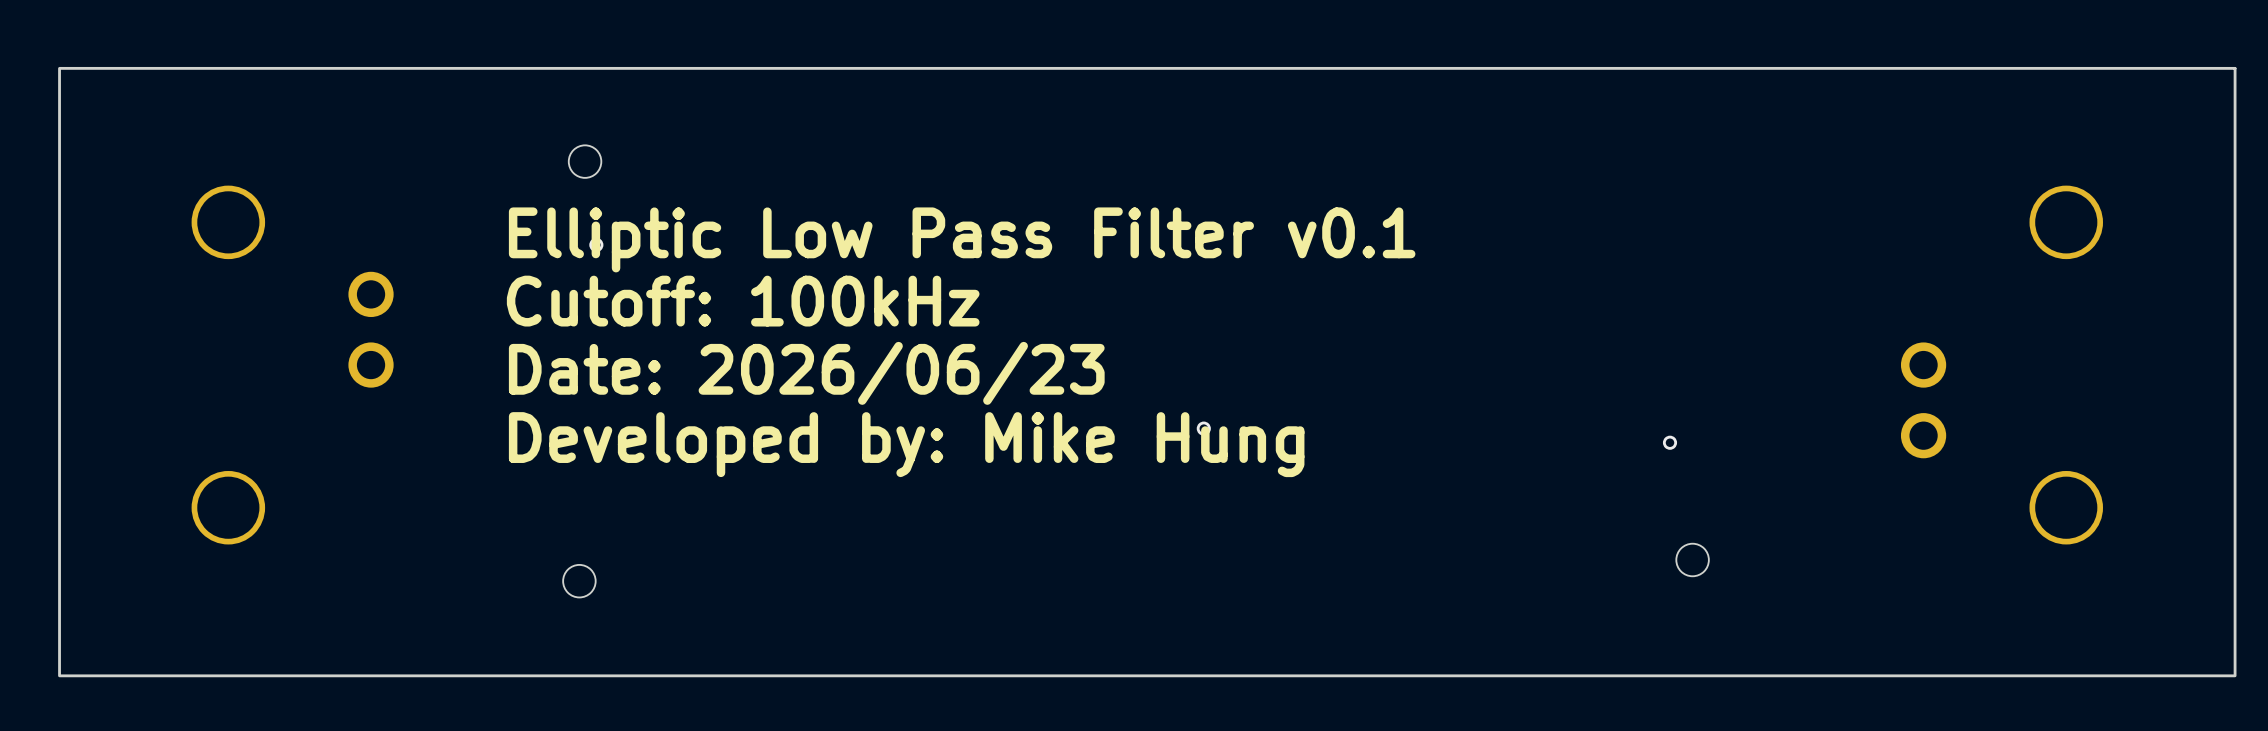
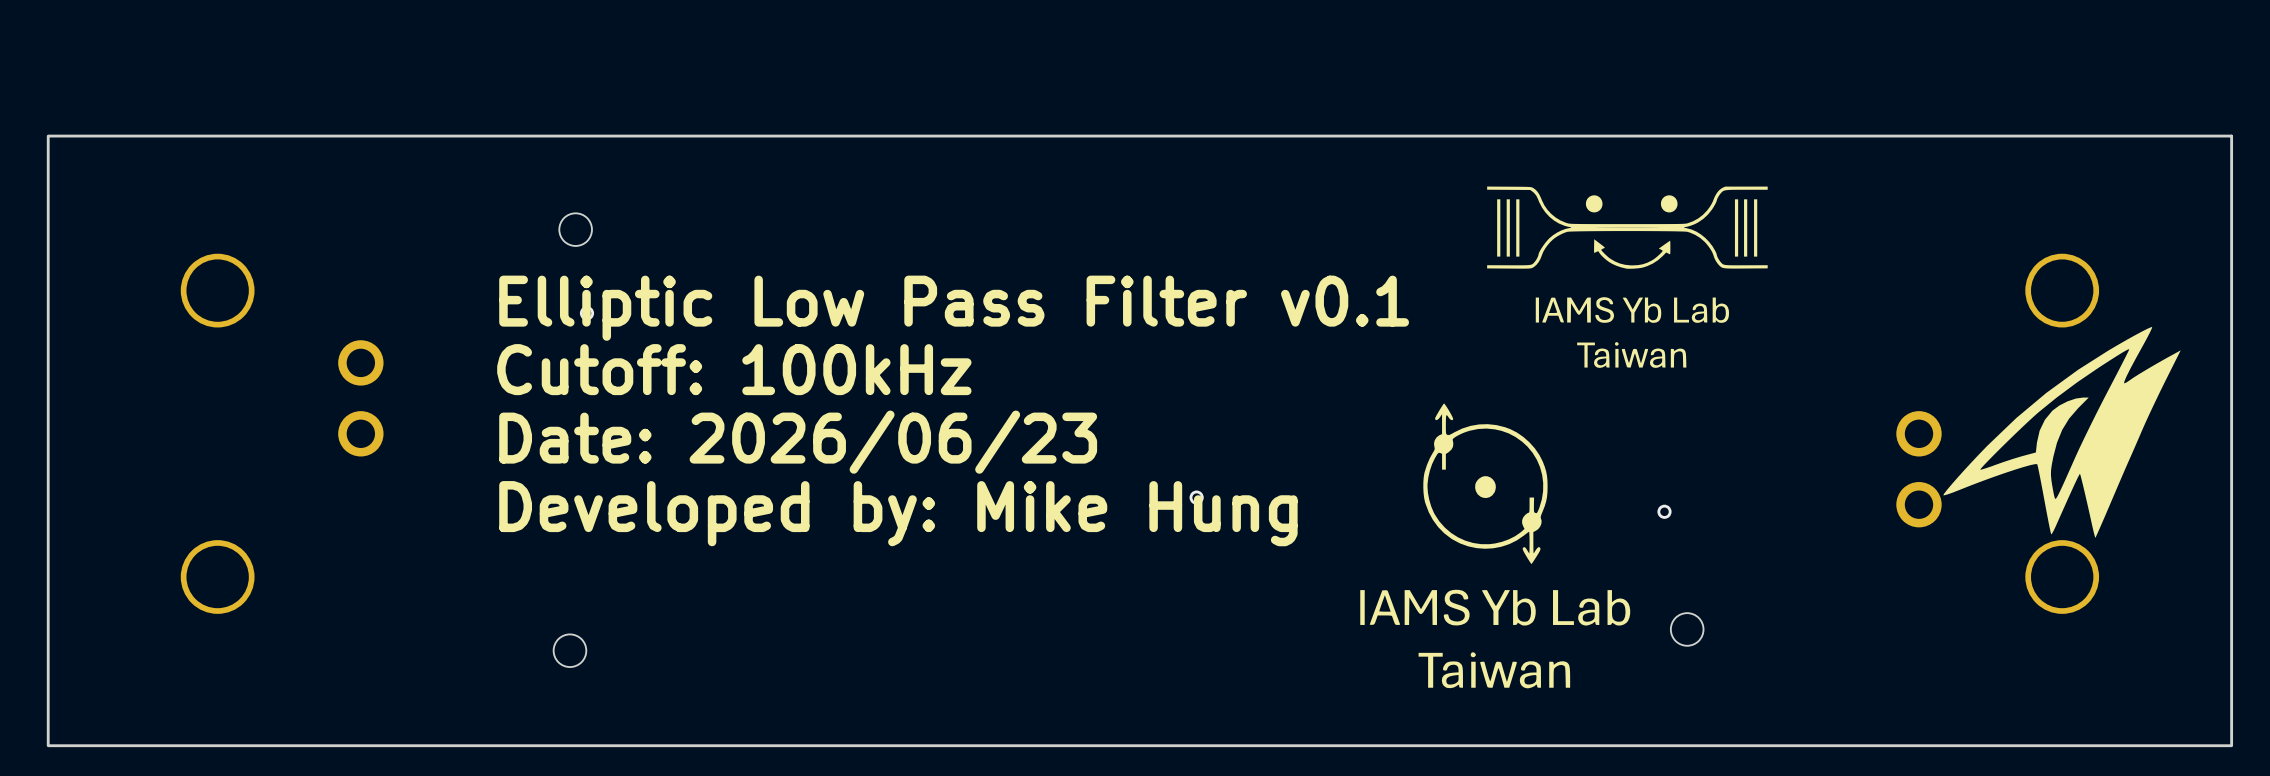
drawing: none -> [1487, 186, 1768, 368]
drawing: none -> [1943, 327, 2181, 538]
drawing: none -> [1360, 403, 1631, 689]

